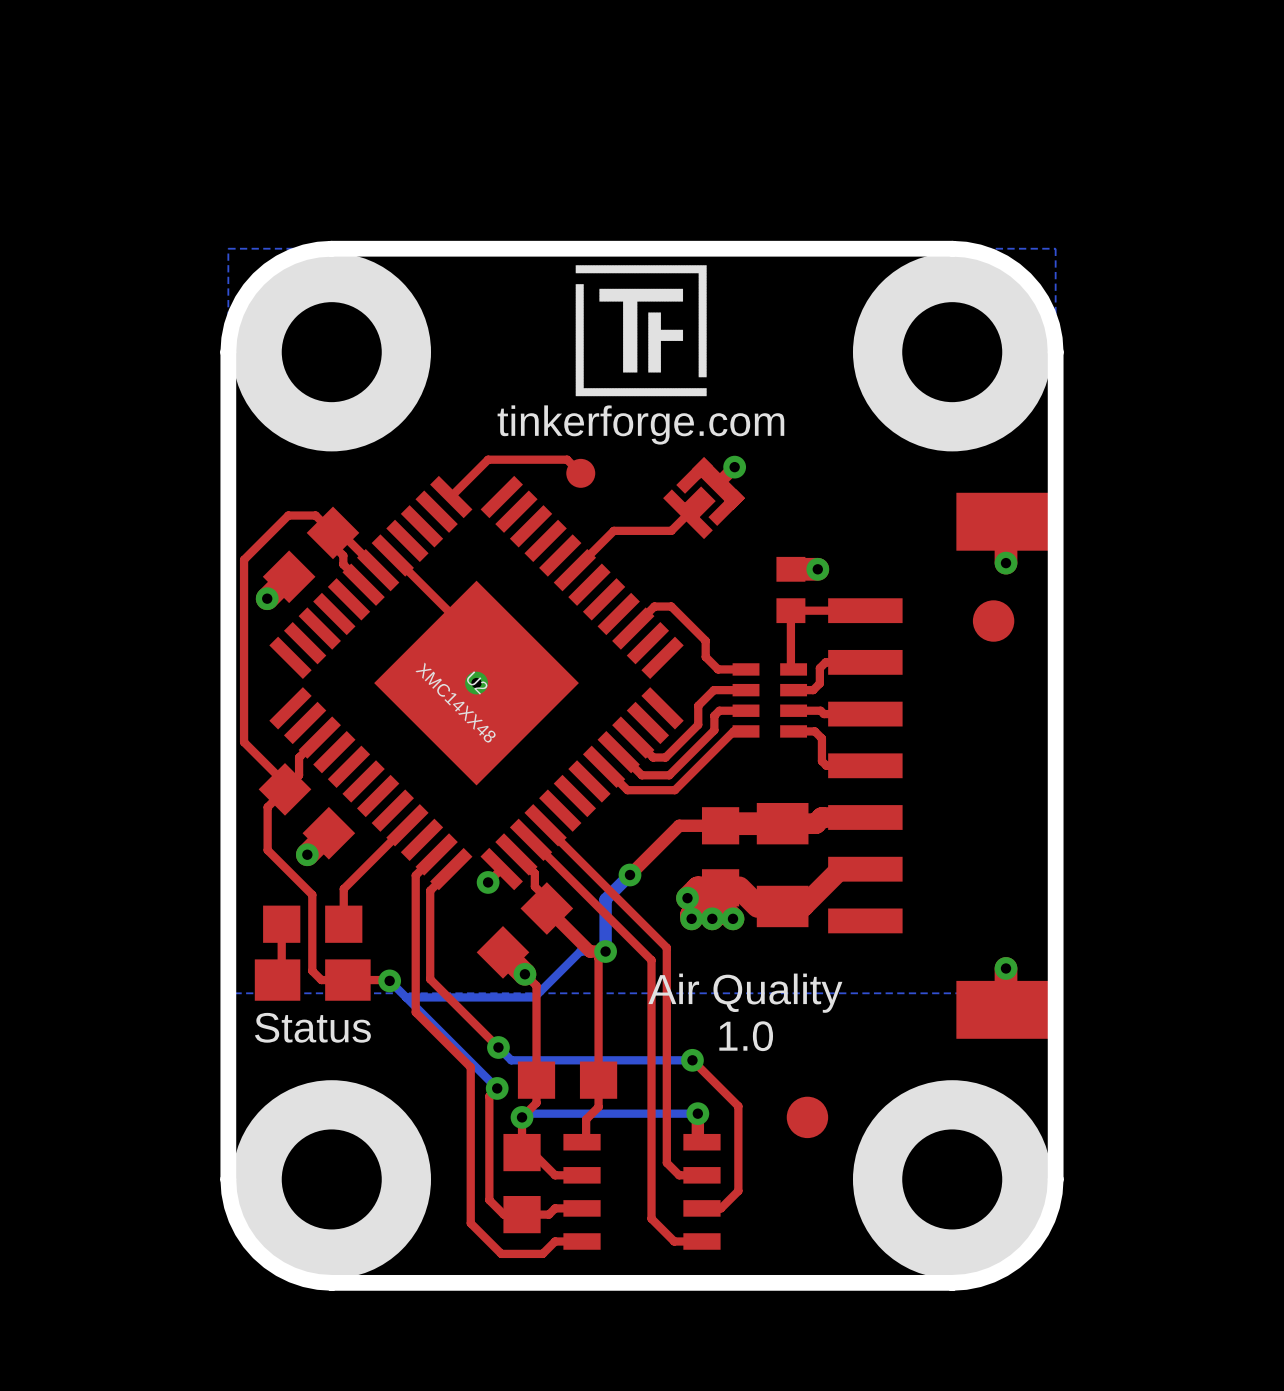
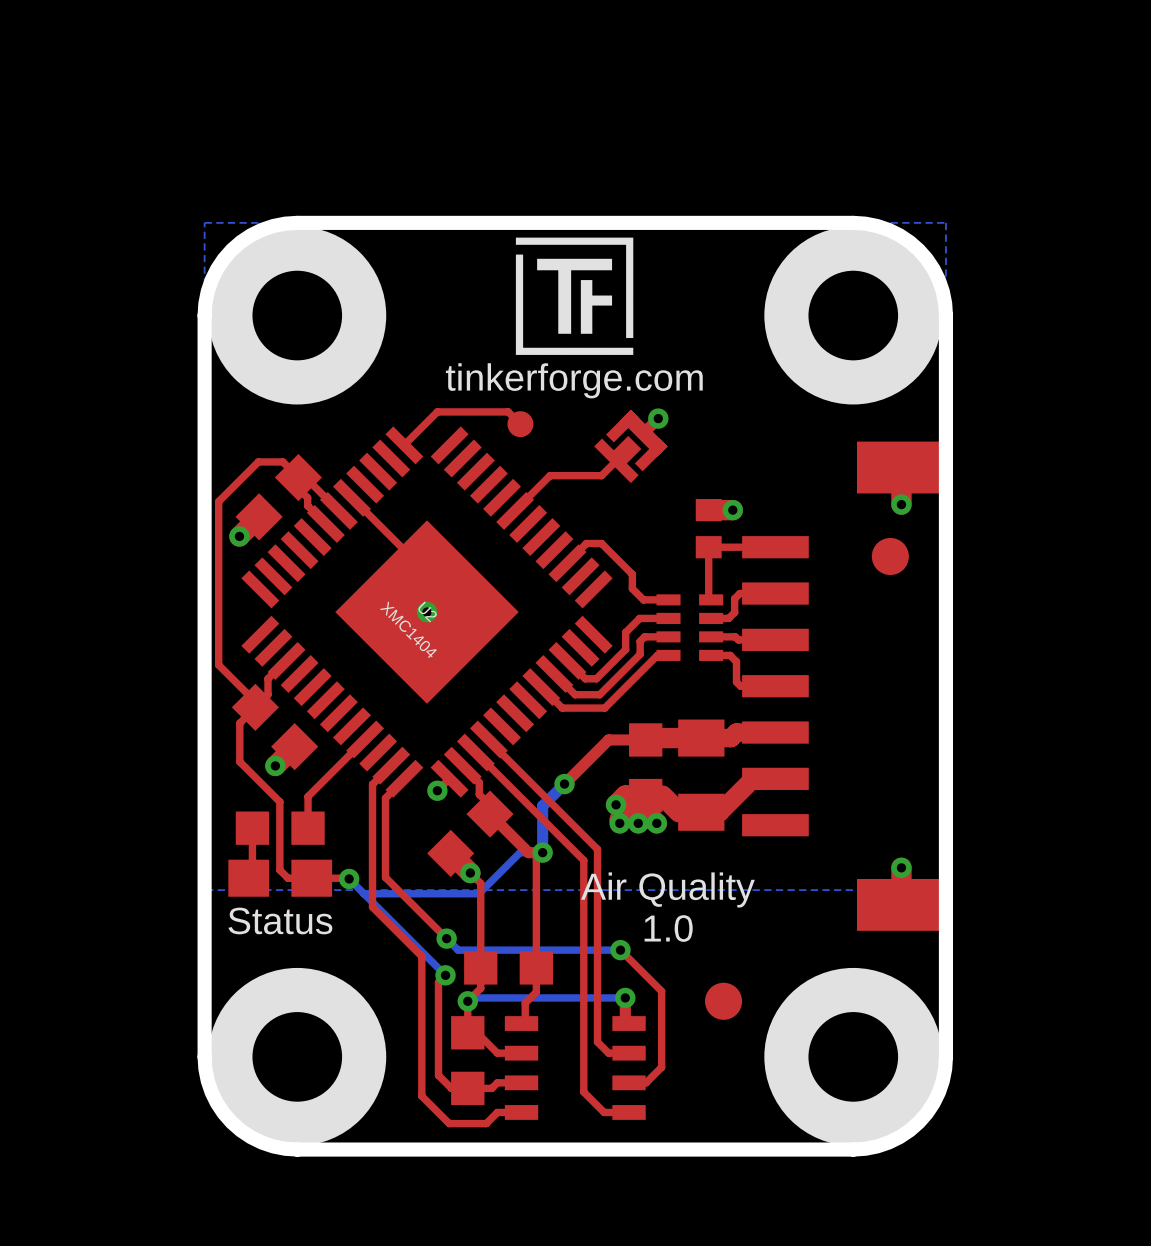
U2 value: XMC14XX48 (455, 702) -> XMC1404 (408, 629)

